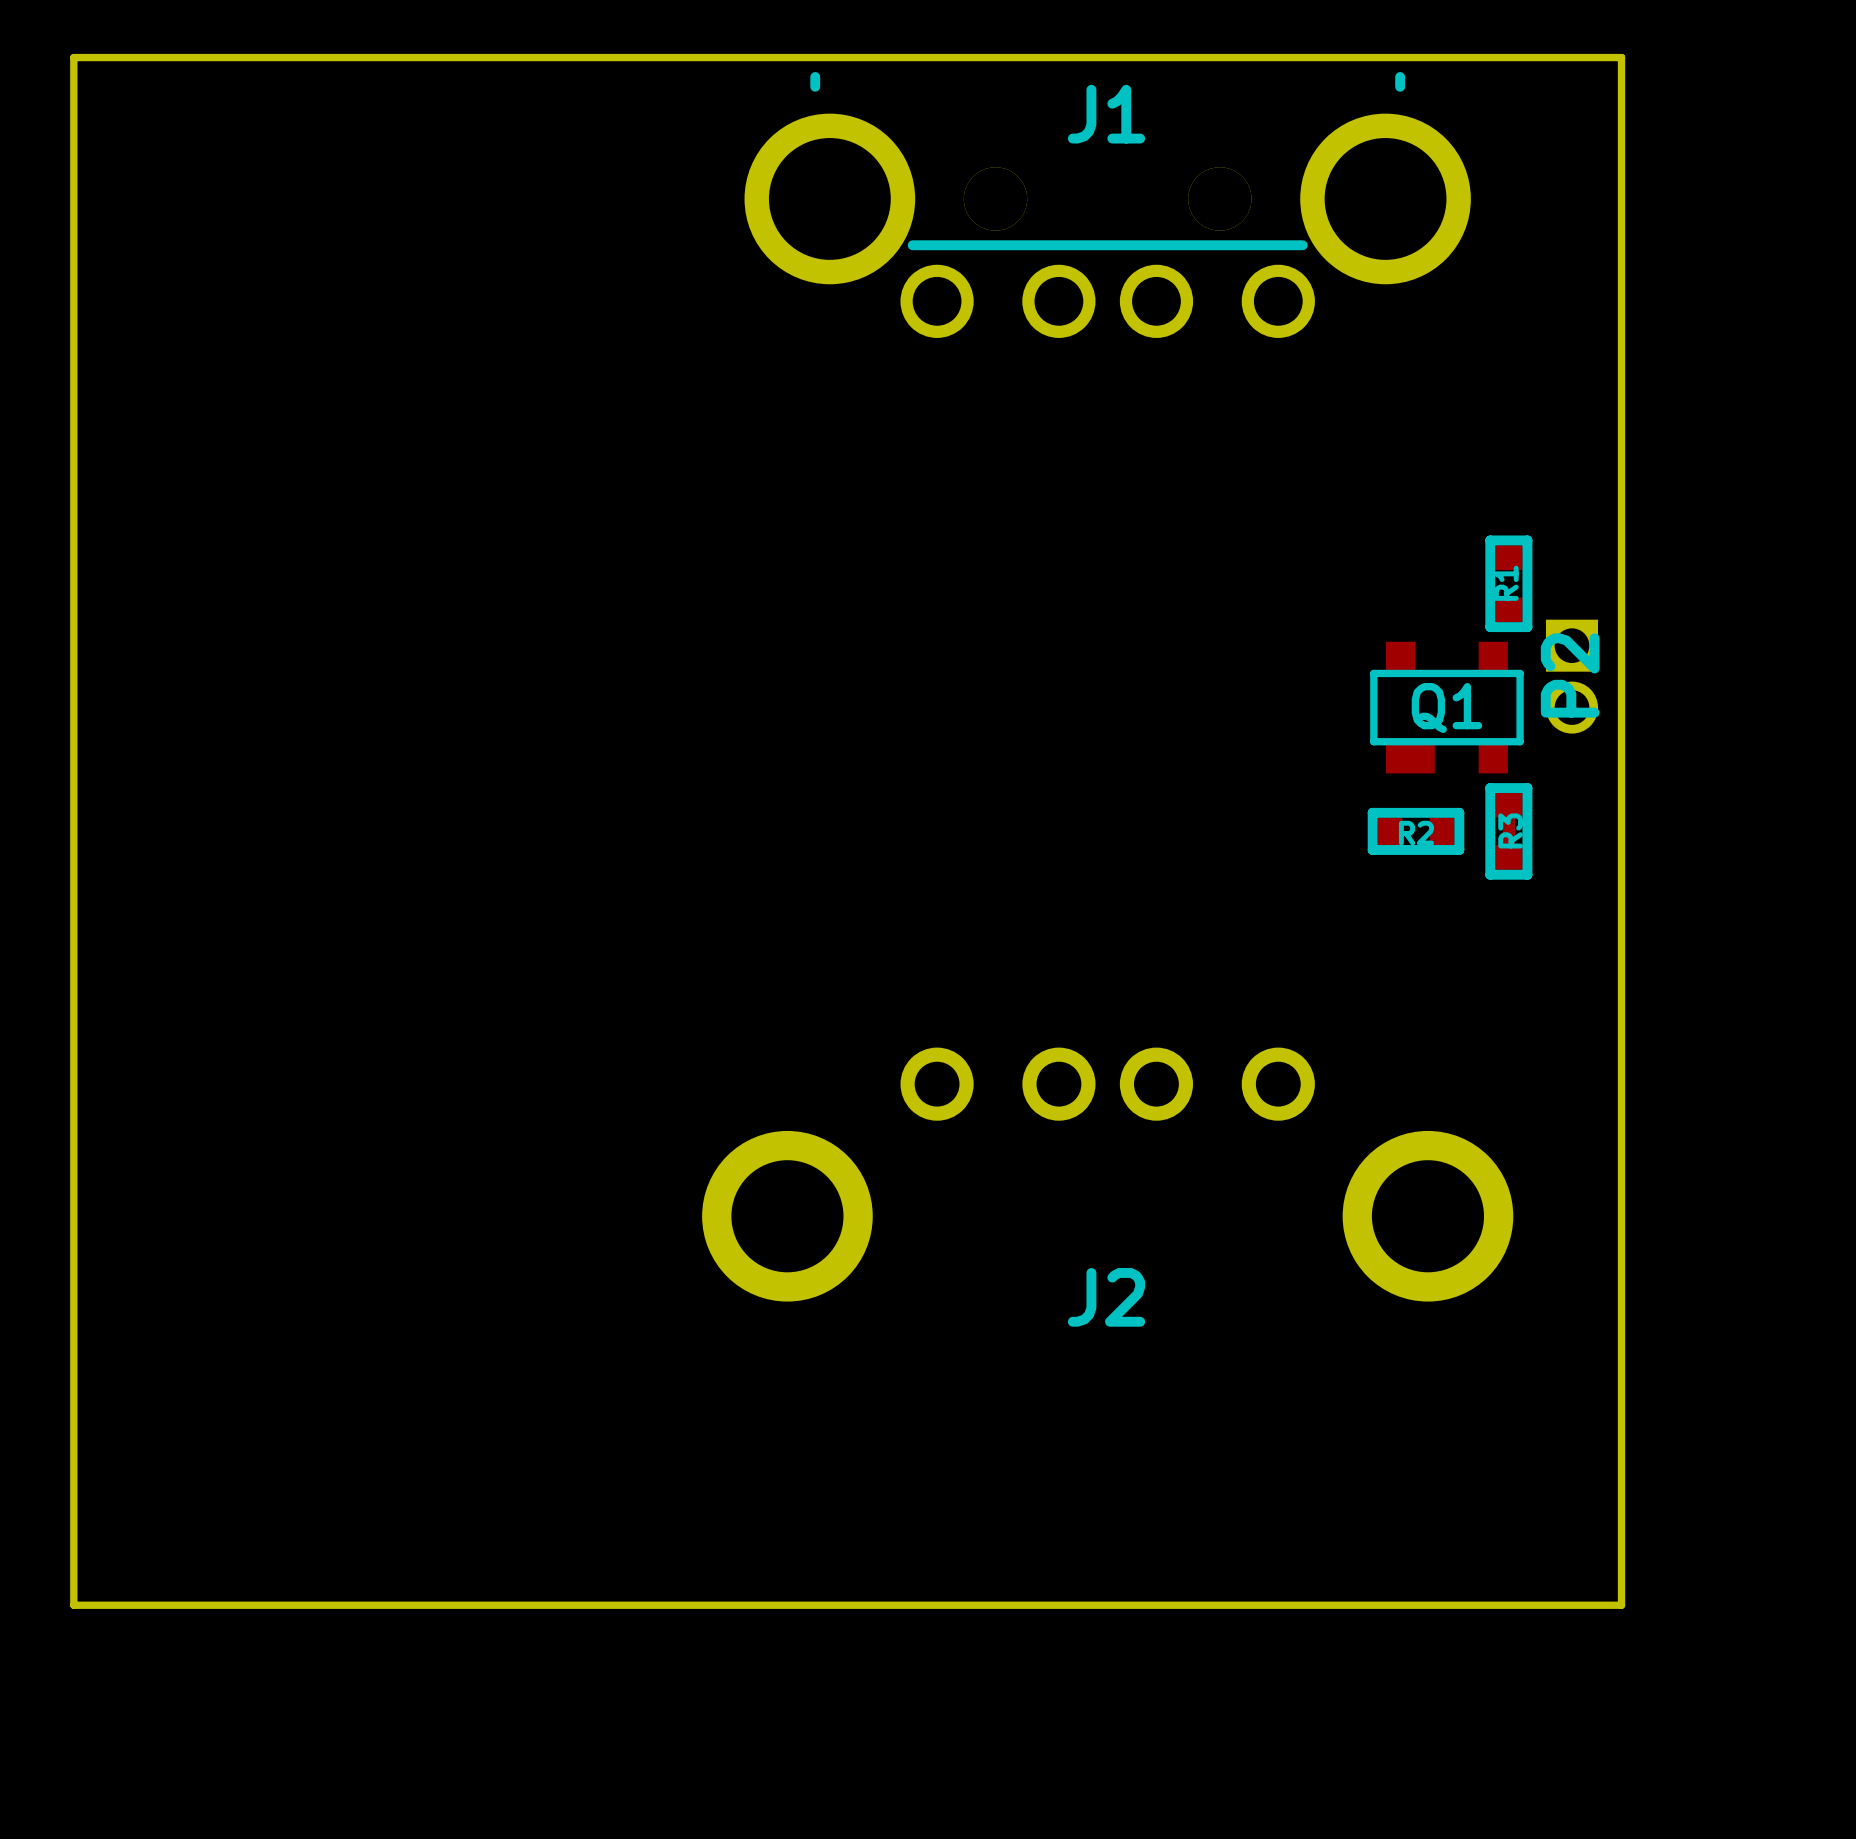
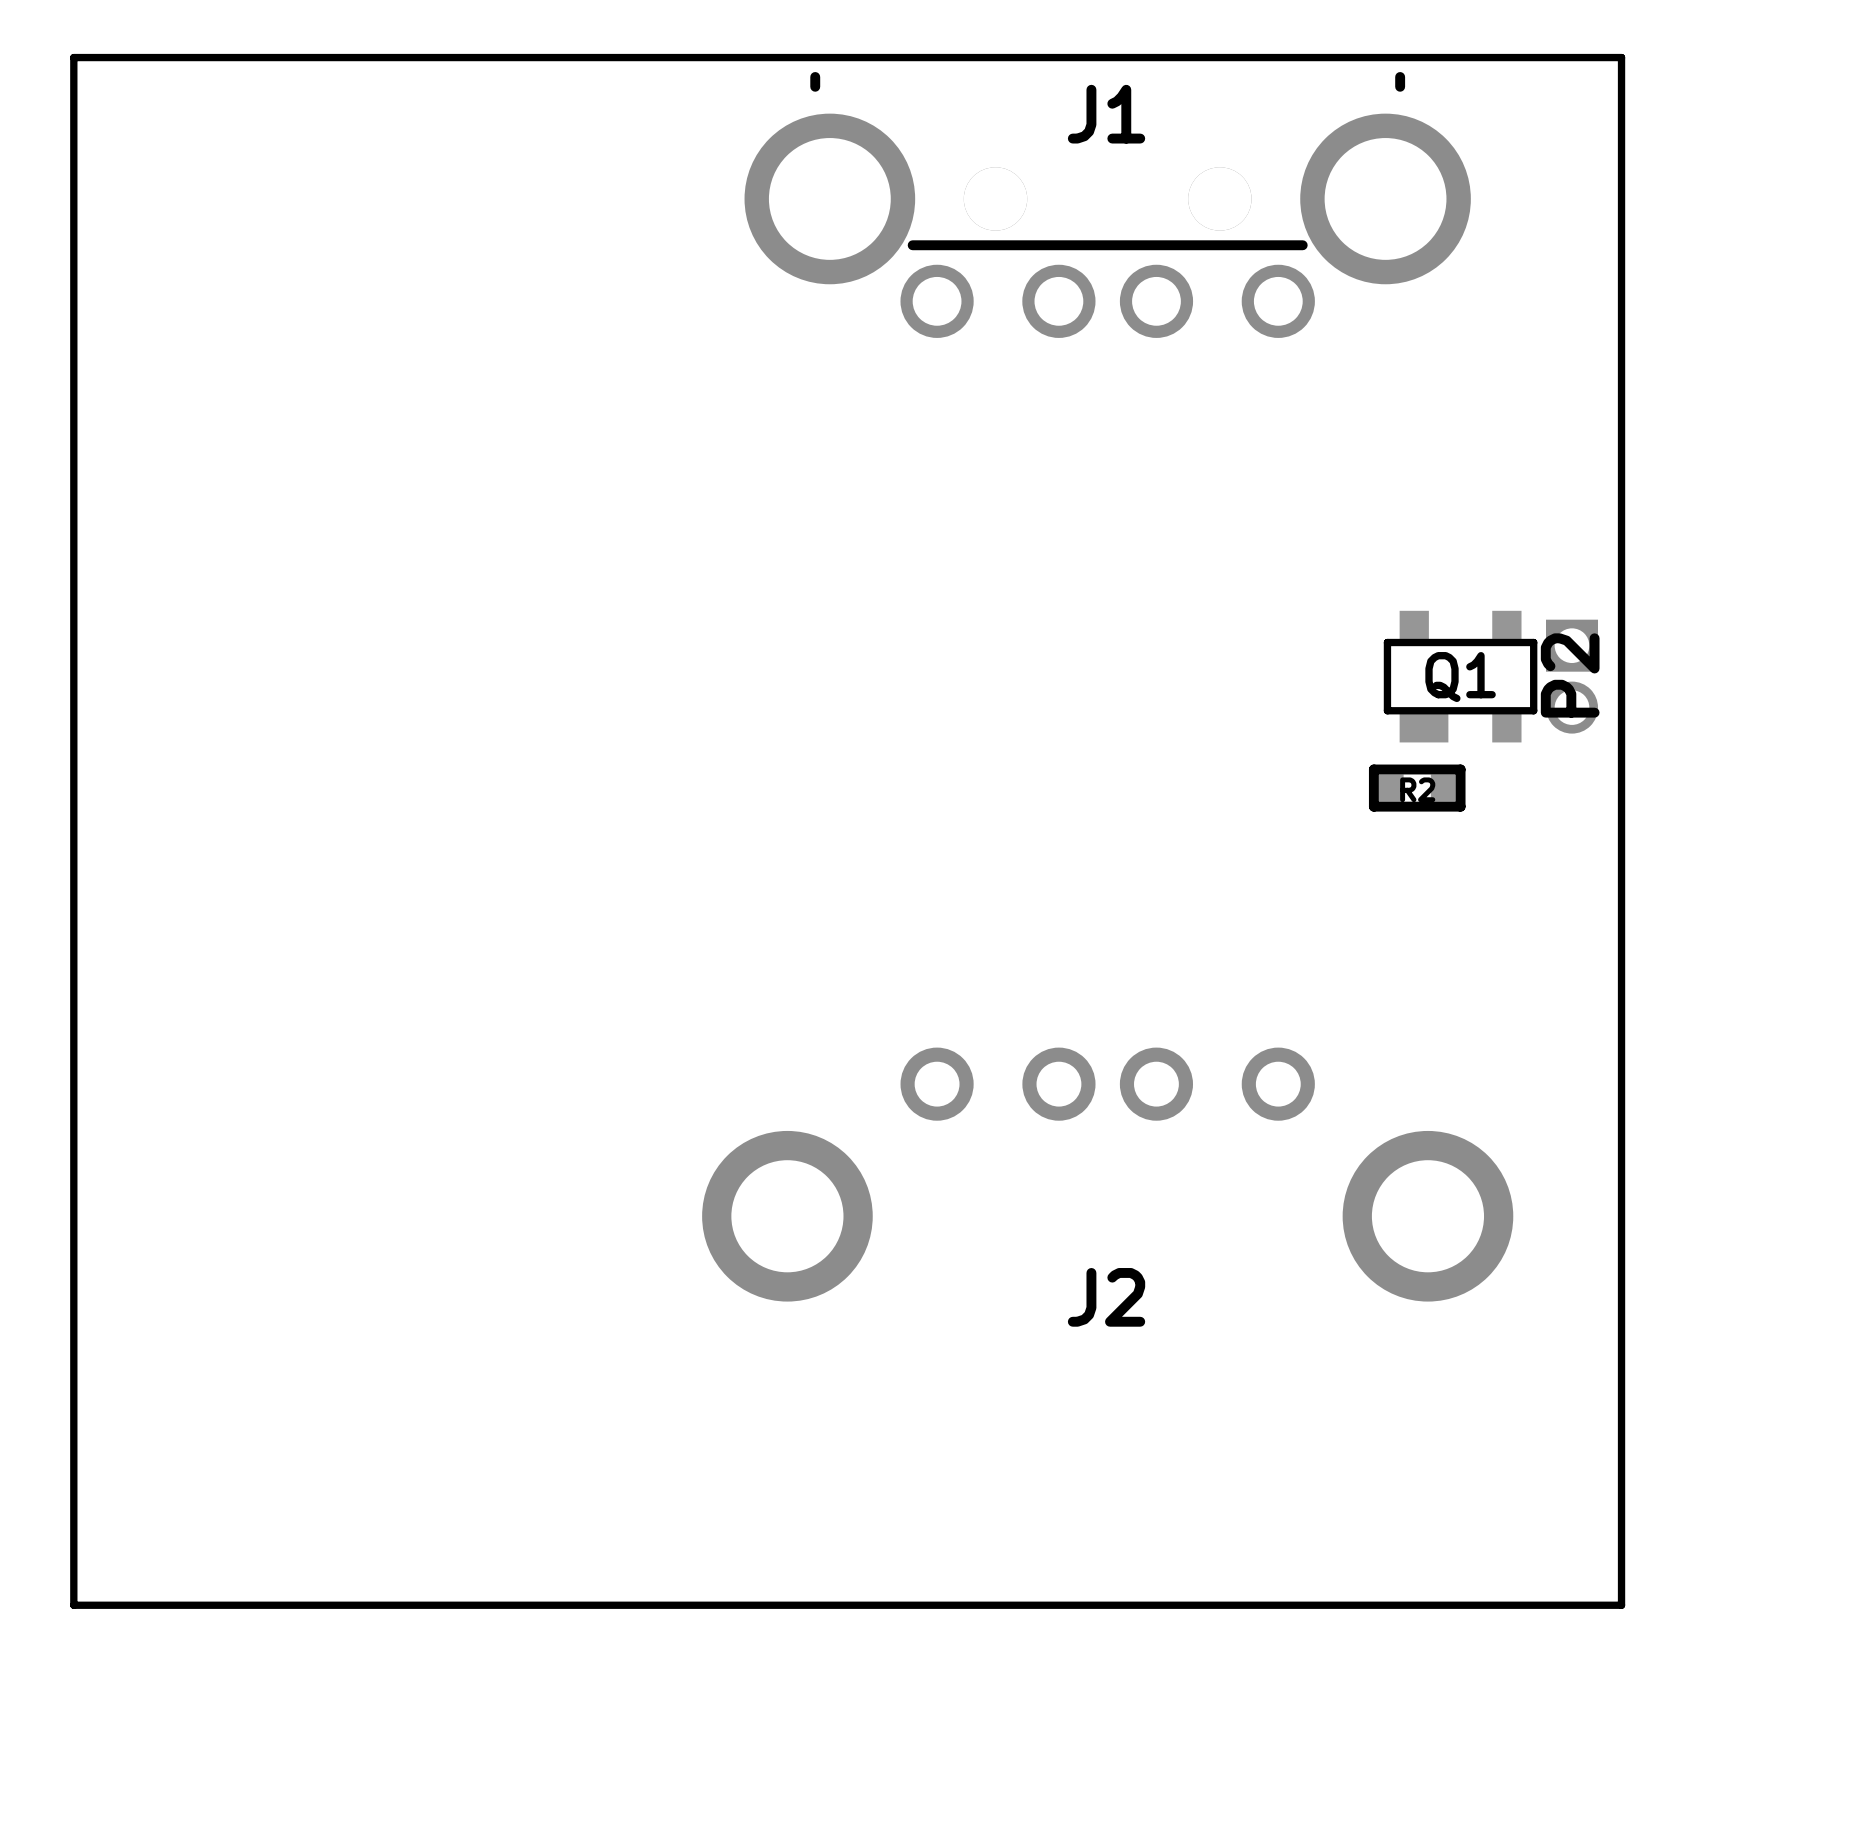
R1: (1508, 583) -> none
Q1 position: (1446, 707) -> (1460, 676)
R2 position: (1415, 831) -> (1417, 788)
R3: (1508, 831) -> none

